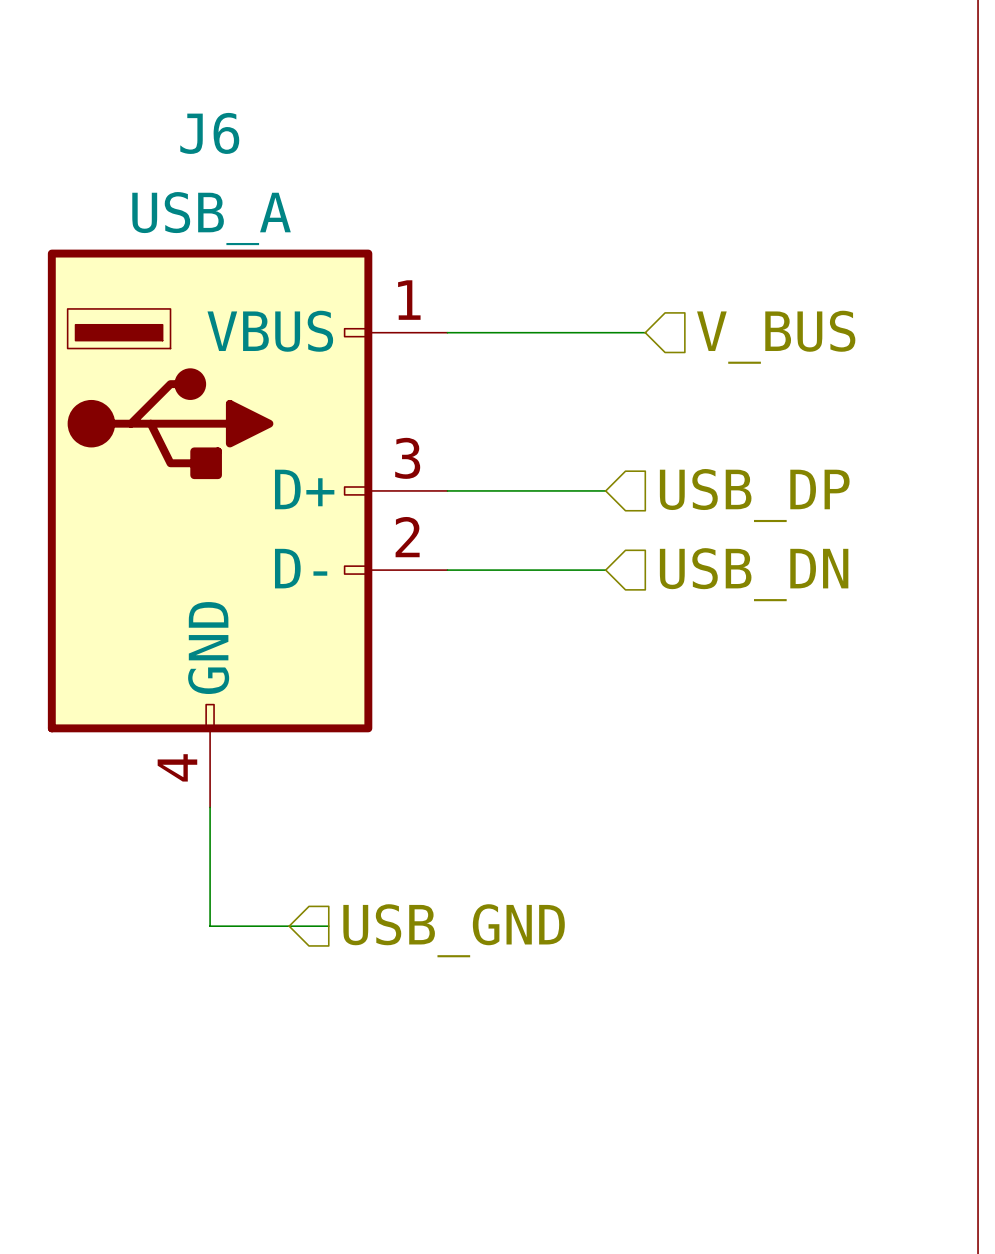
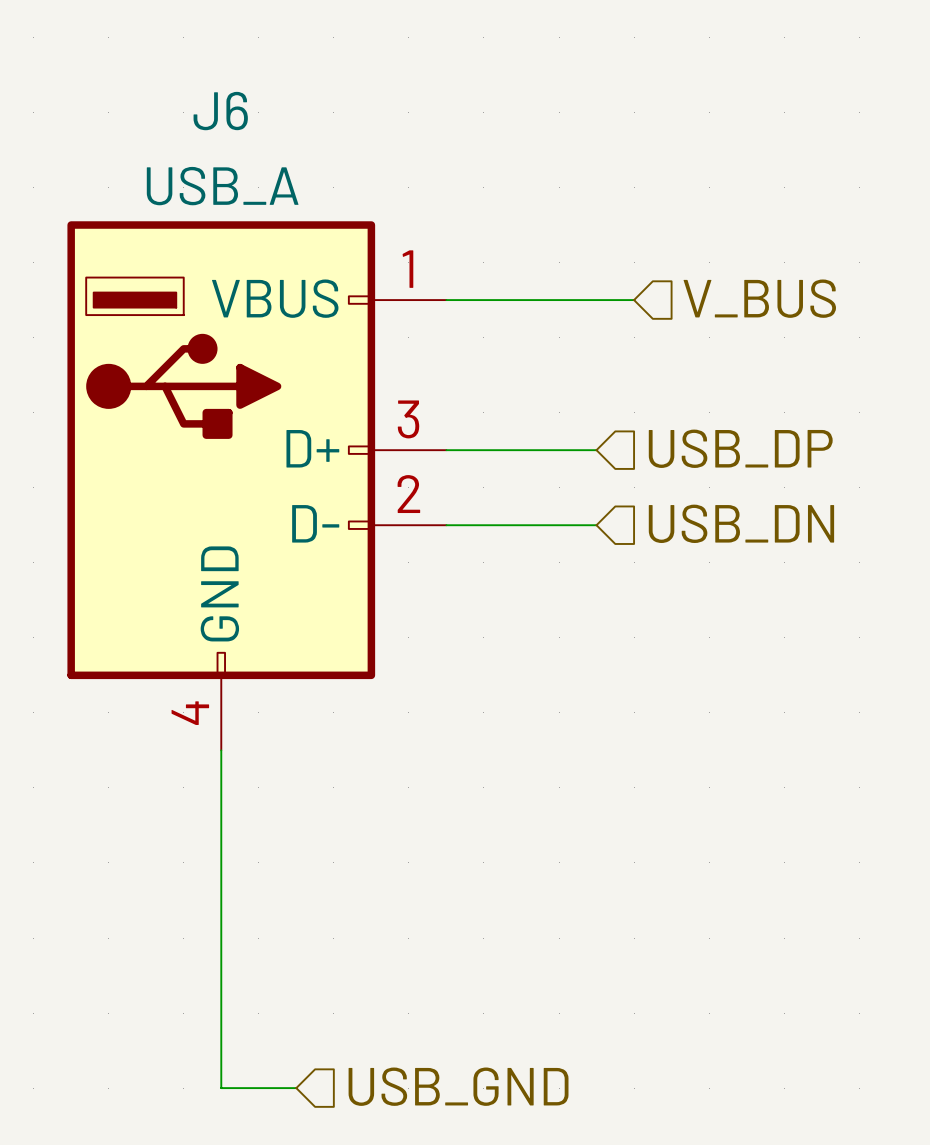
wire: (210, 926) (328, 926) -> (221, 862) (221, 1088) (296, 1088)
hierarchical label position: USB_GND (454, 930) -> USB_GND (458, 1086)

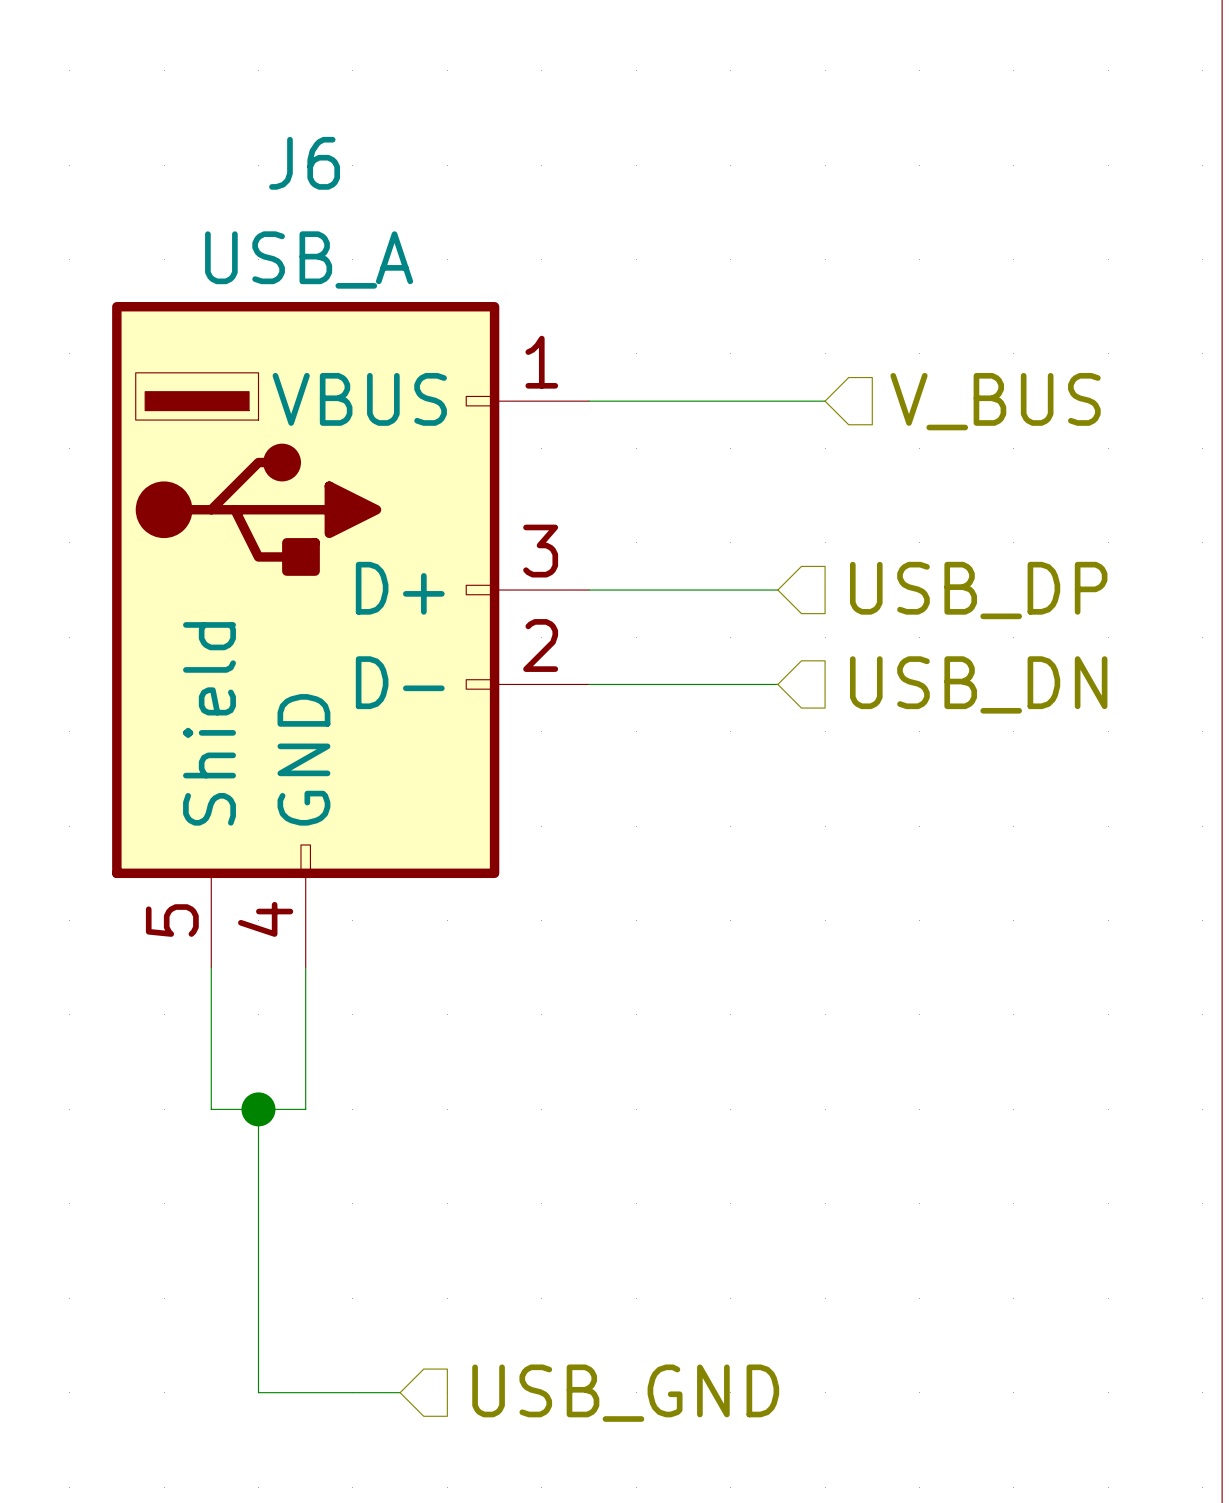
J6 symbol: [67, 221, 447, 751] -> [112, 302, 590, 968]
wire: none -> (211, 967) (211, 1109) (305, 1109)
junction: none -> (258, 1109)
wire: (221, 862) (221, 1088) -> (258, 1109) (258, 1392) (305, 1392)

